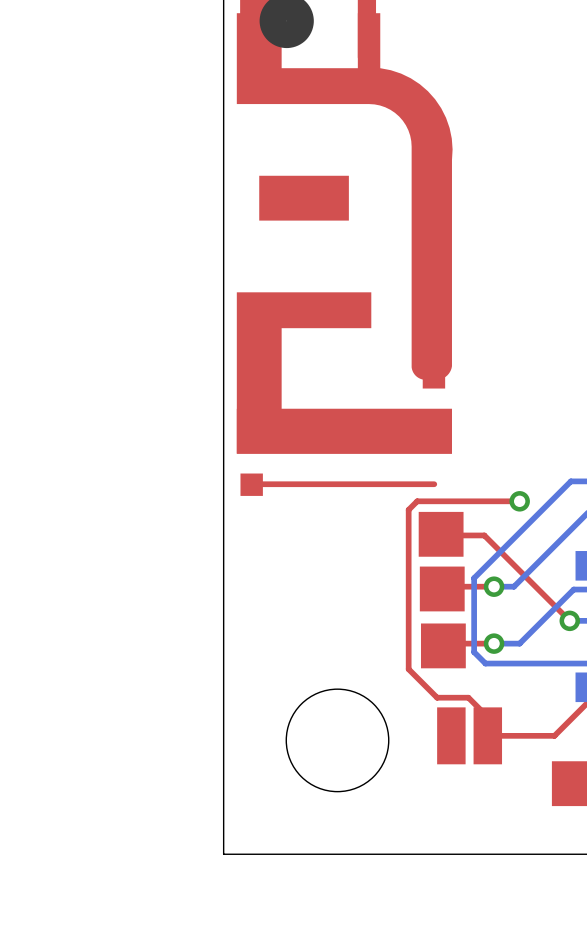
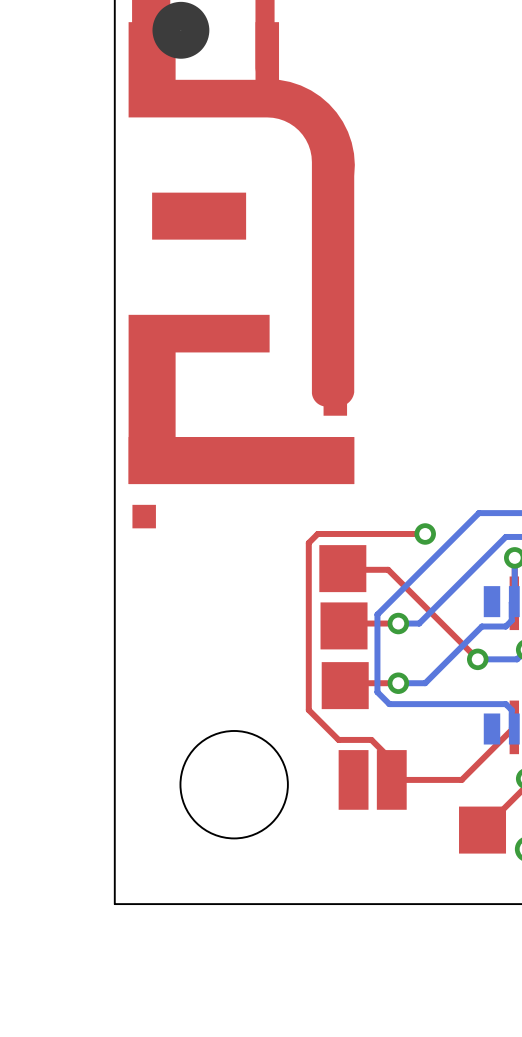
top track: (434, 484) (252, 484) -> none

